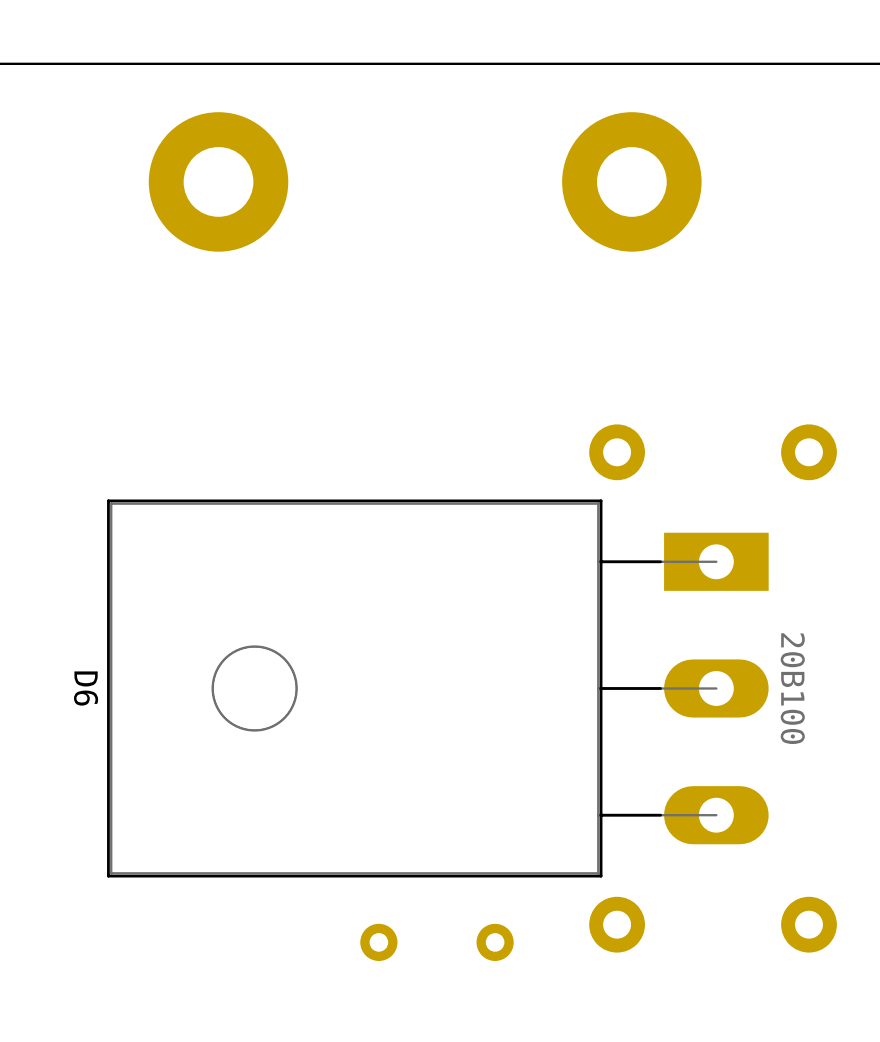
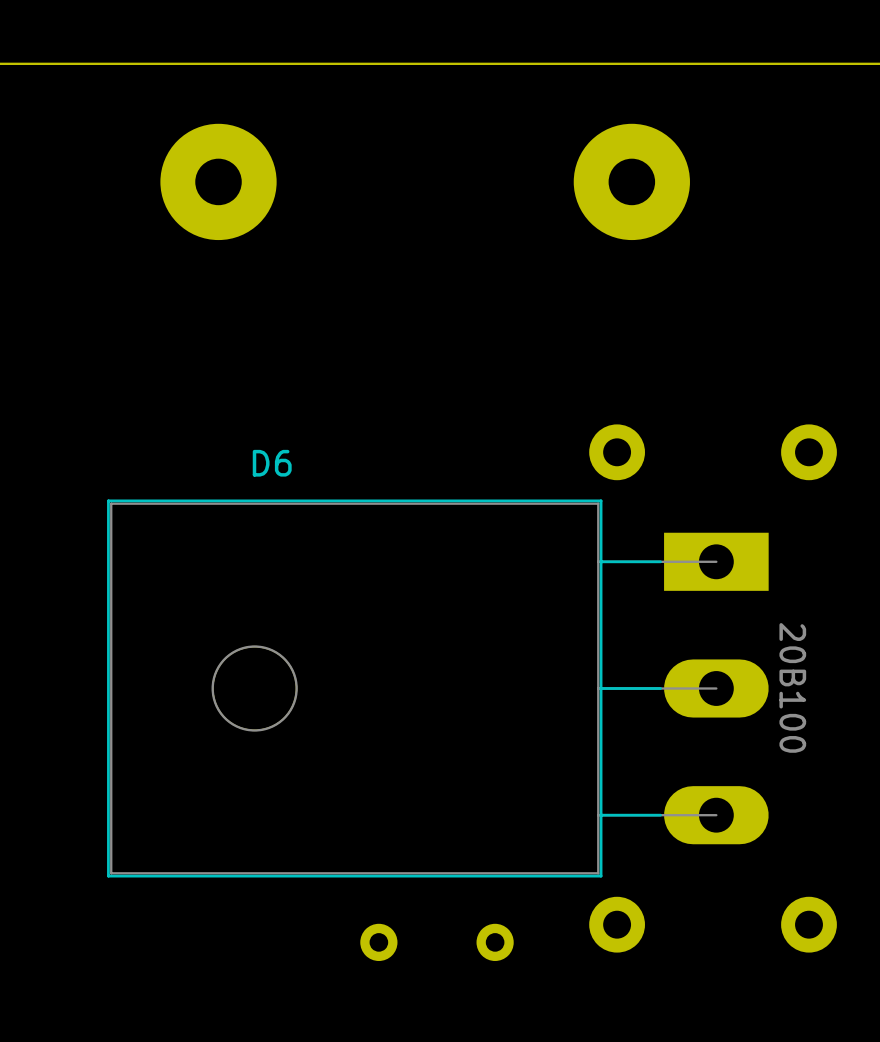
part footprint: [148, 112, 289, 252] -> [160, 123, 277, 241]
part footprint: [562, 112, 702, 252] -> [573, 123, 690, 241]
D6 name rotation: 0° (86, 688) -> 90° counterclockwise (272, 463)
D6 name position: D6 (86, 688) -> D6 (272, 463)

